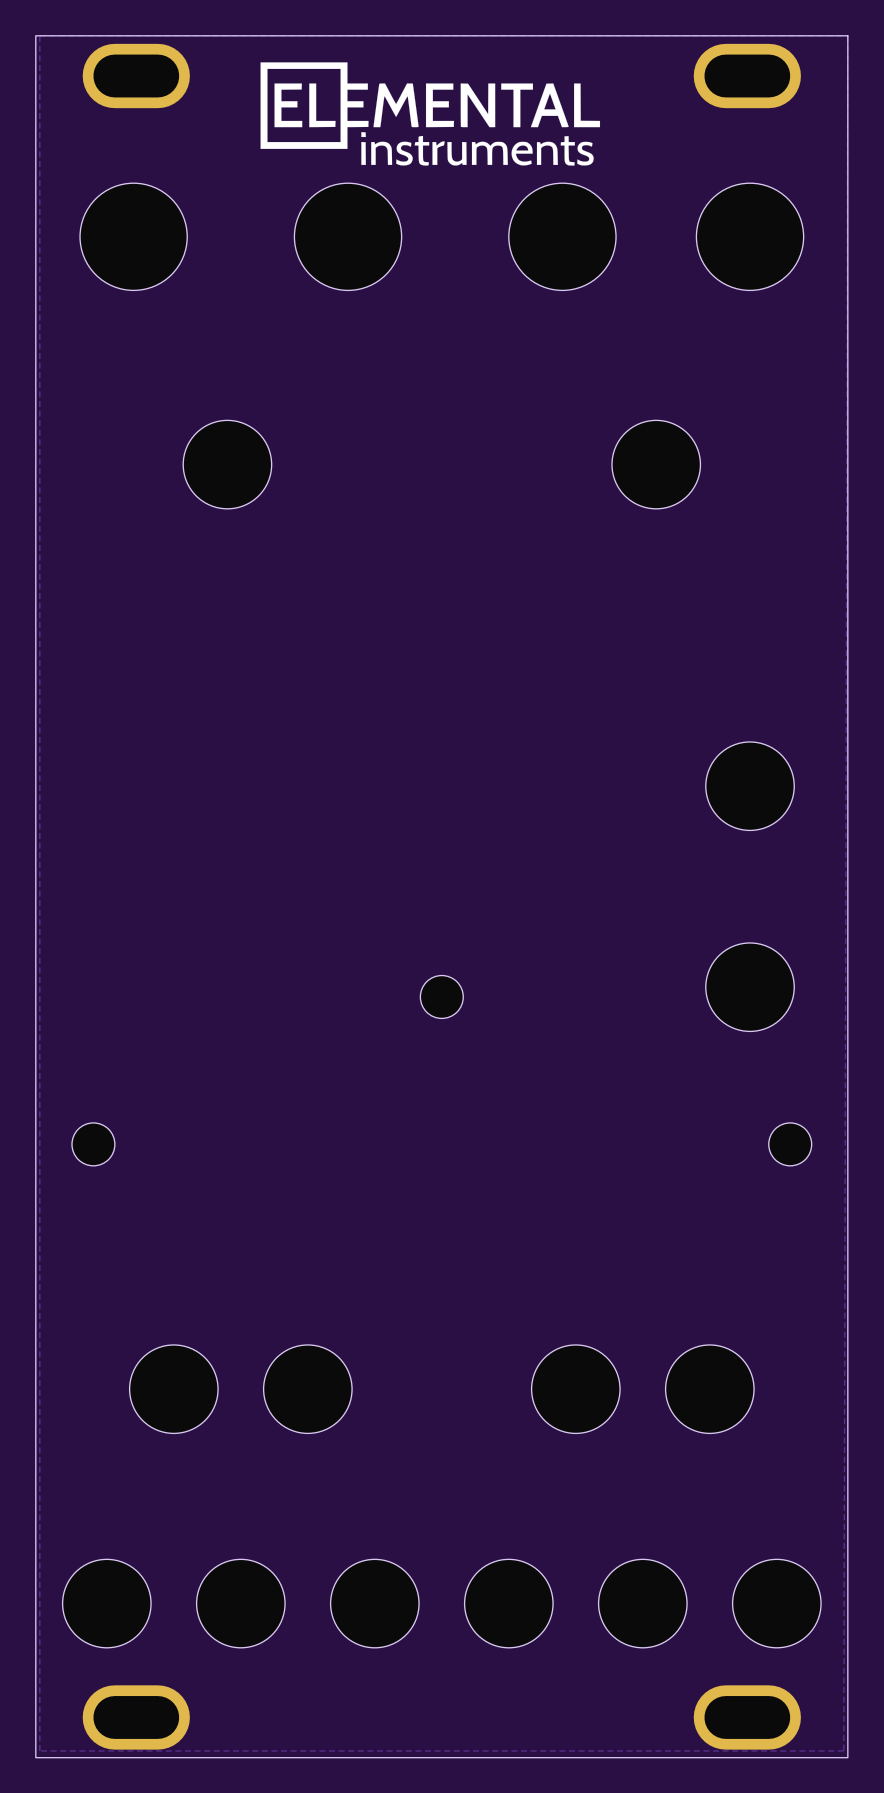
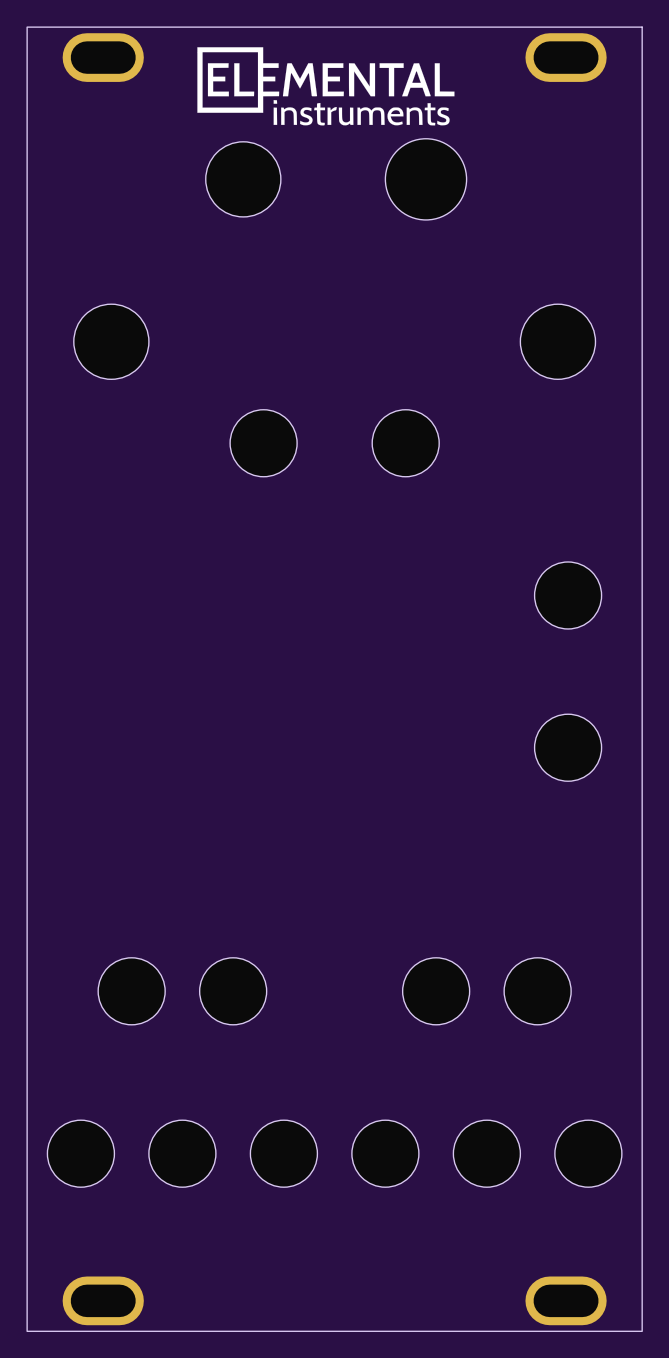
zone outline: (847, 35) (843, 1750) (39, 1750) (39, 35) (847, 35) -> none
part: (133, 236) -> none
part: none -> (243, 179)
part: (348, 236) -> none
part: (750, 236) -> none
part: none -> (111, 341)
part: none -> (557, 341)
part: (227, 464) -> none
part: (656, 464) -> none
part: none -> (263, 443)
part: none -> (405, 443)
part: (441, 996) -> none
part: (93, 1144) -> none
part: (790, 1144) -> none
part: none -> (131, 991)
part: none -> (233, 991)
part: none -> (436, 991)
part: none -> (537, 991)
part: (173, 1389) -> none
part: (307, 1389) -> none
part: (575, 1389) -> none
part: (709, 1389) -> none
part: none -> (80, 1153)
part: none -> (182, 1153)
part: none -> (283, 1153)
part: none -> (385, 1153)
part: none -> (486, 1153)
part: none -> (588, 1153)
part: (106, 1603) -> none
part: (240, 1603) -> none
part: (374, 1603) -> none
part: (508, 1603) -> none
part: (642, 1603) -> none
part: (776, 1603) -> none

